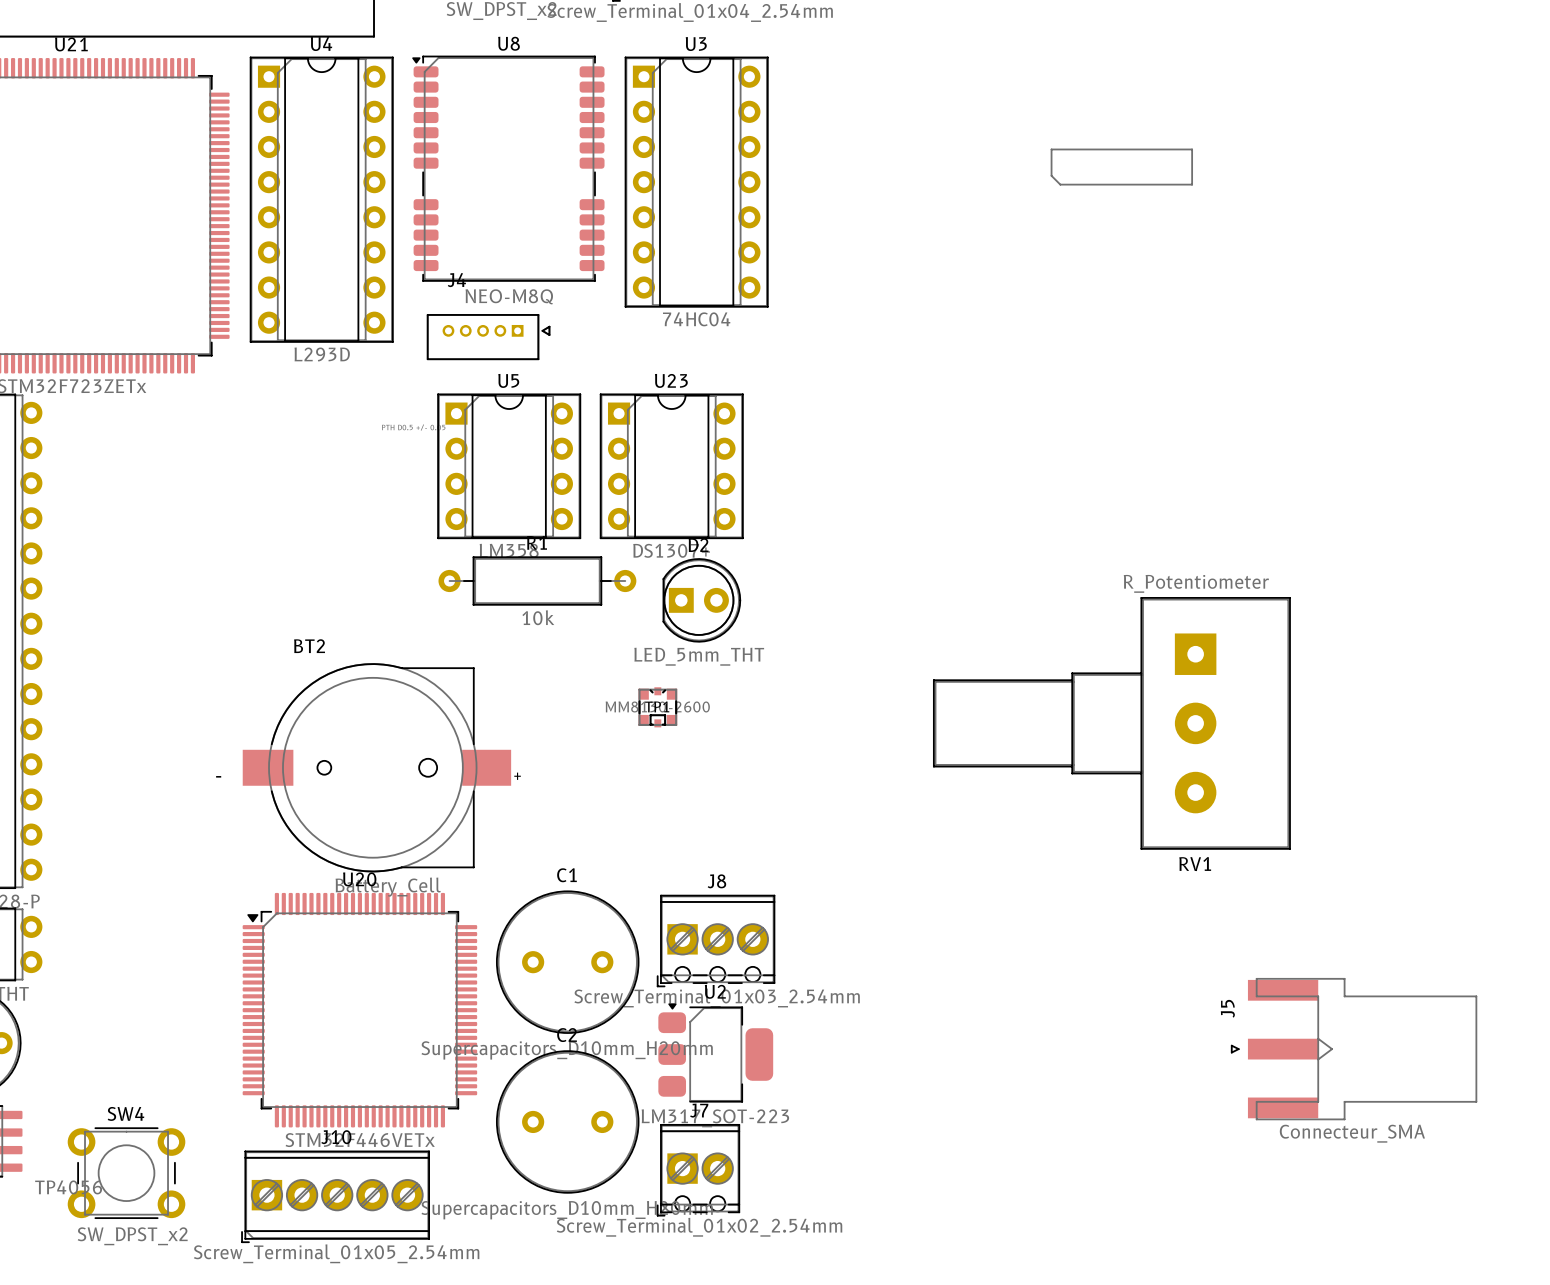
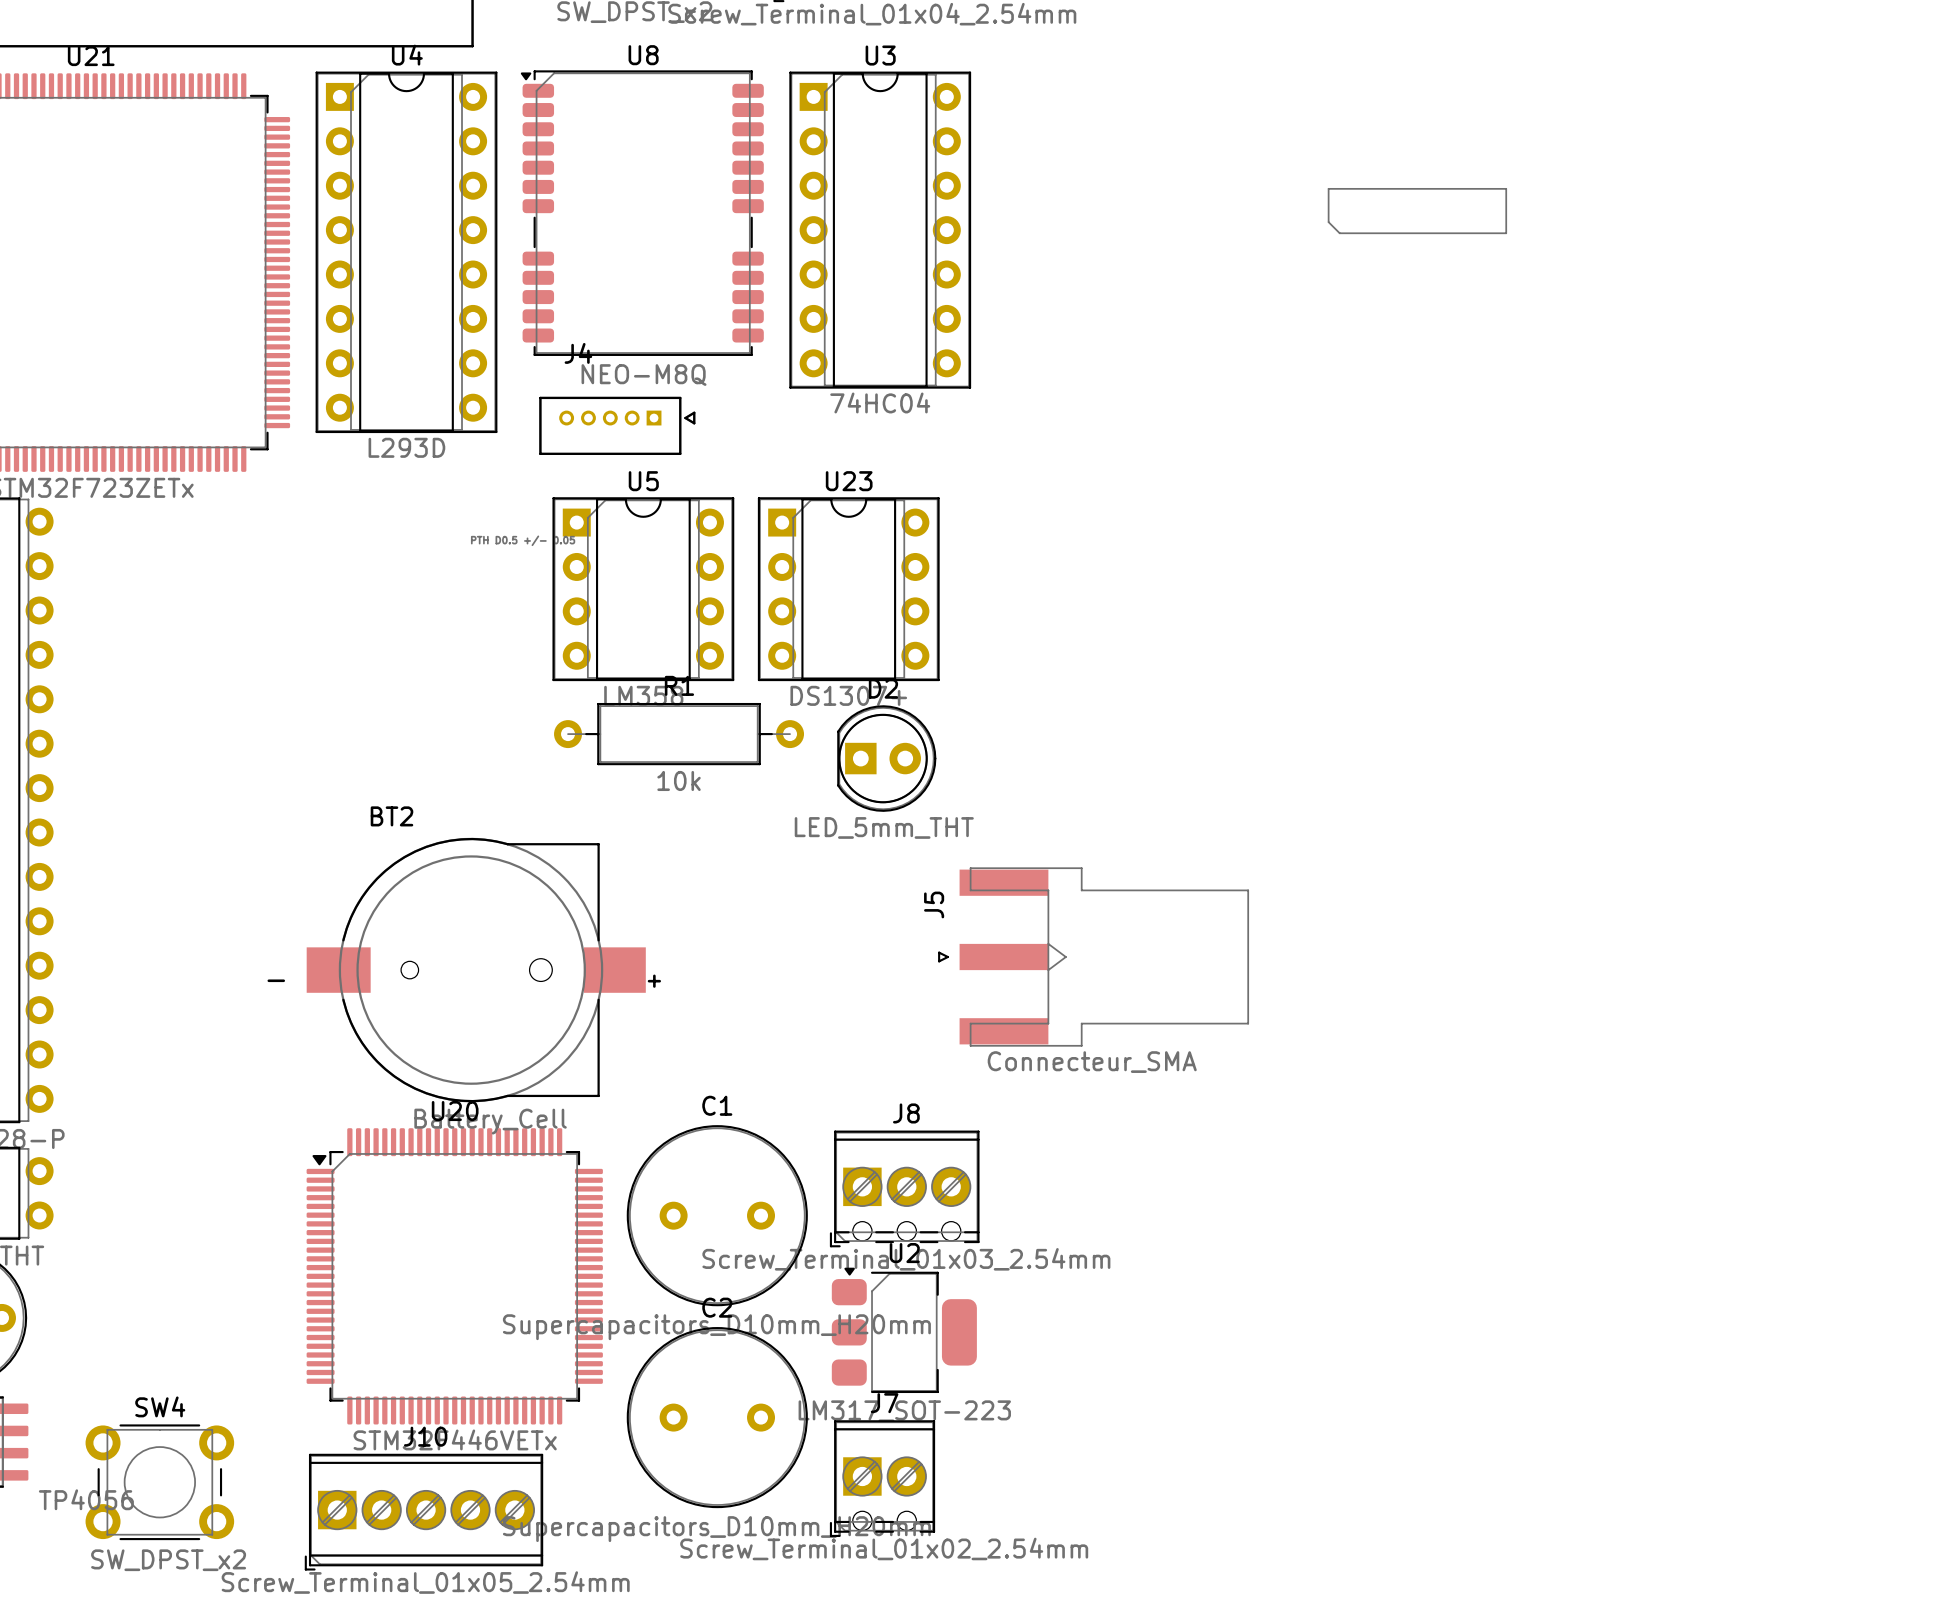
TP1: MM8130-2600 (657, 707) -> none
RV1: R_Potentiometer (1111, 723) -> none
J5 position: (1353, 1049) -> (1093, 957)

